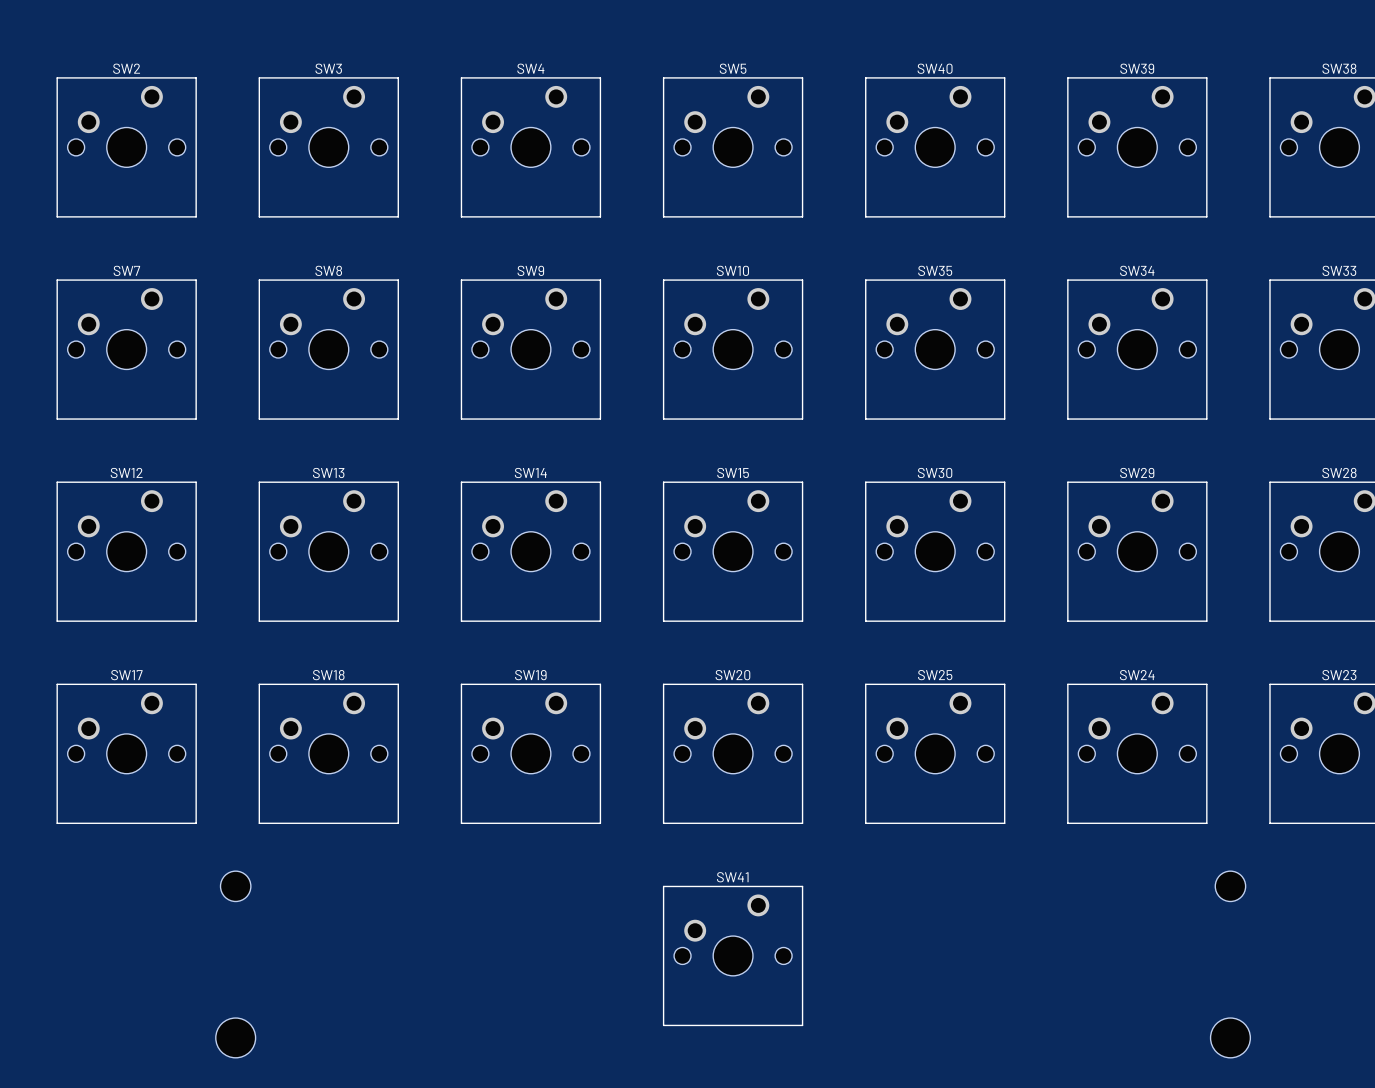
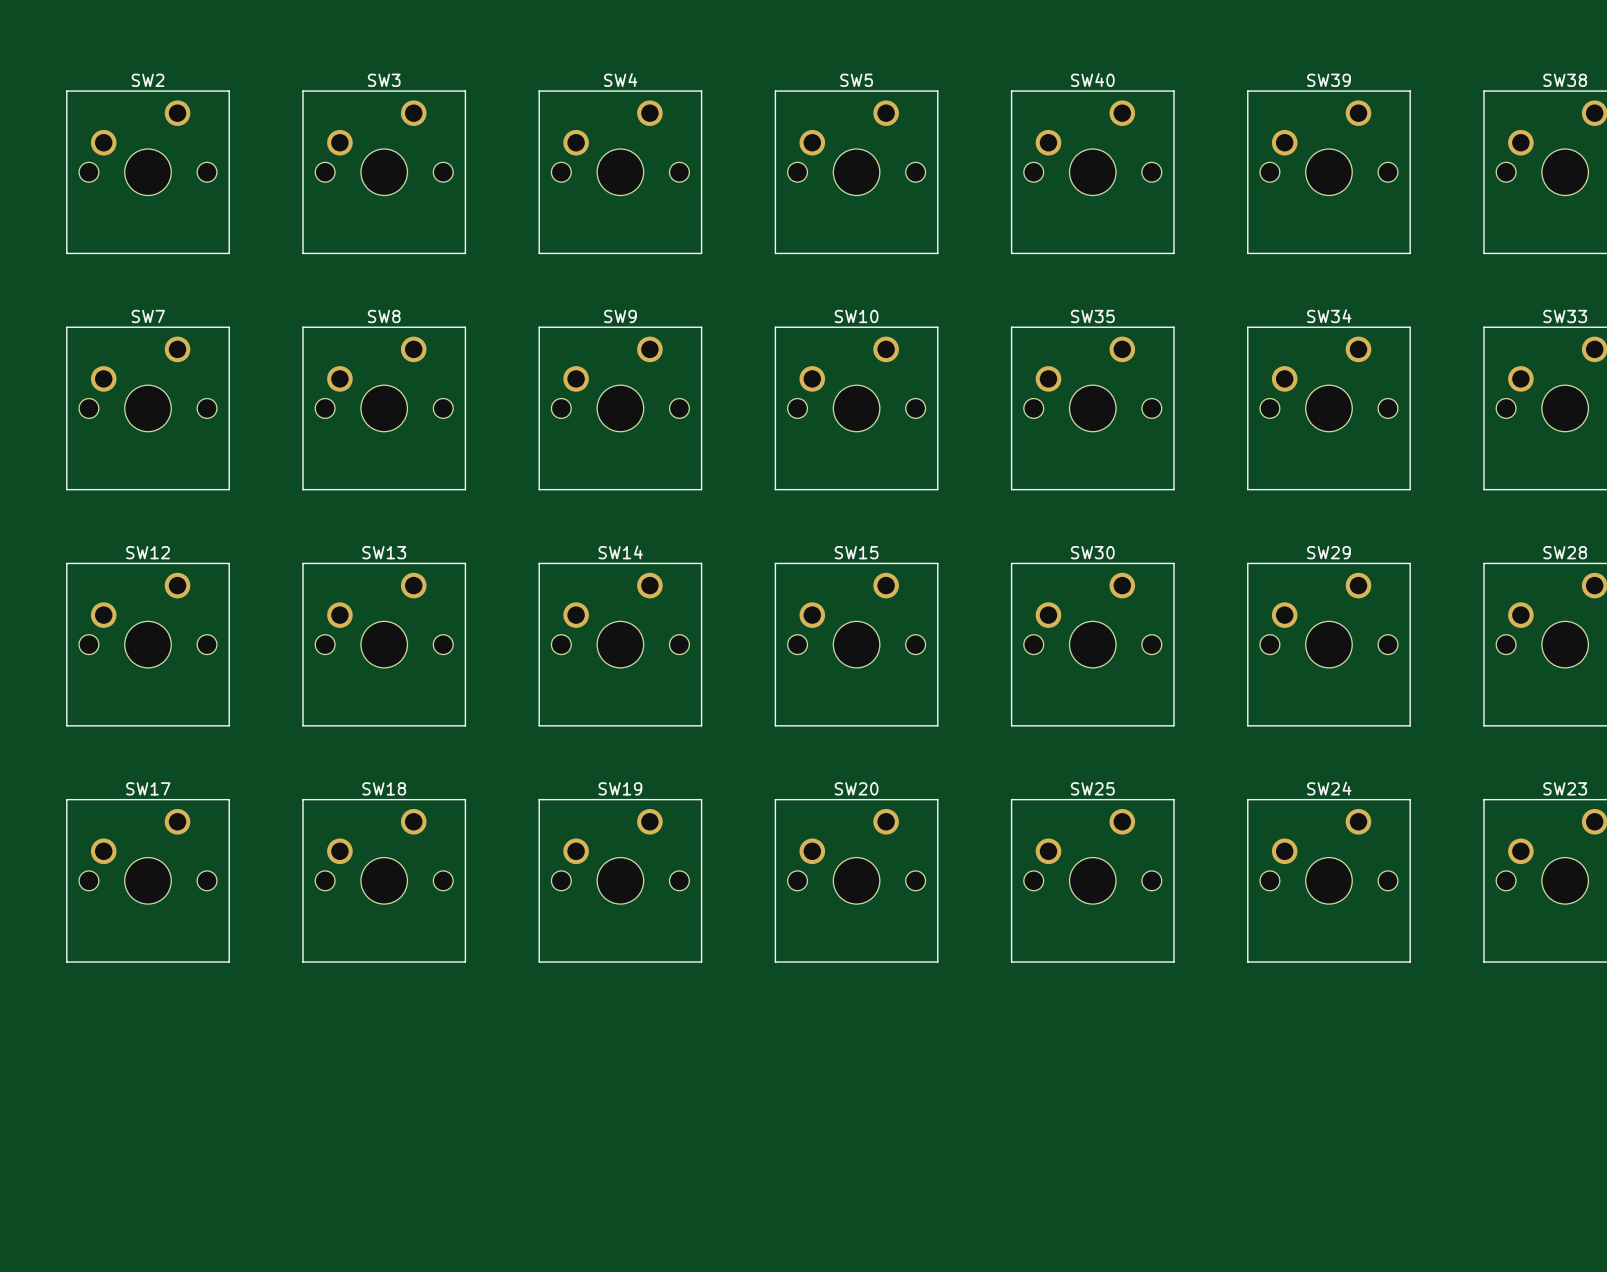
SW41: (733, 964) -> none

